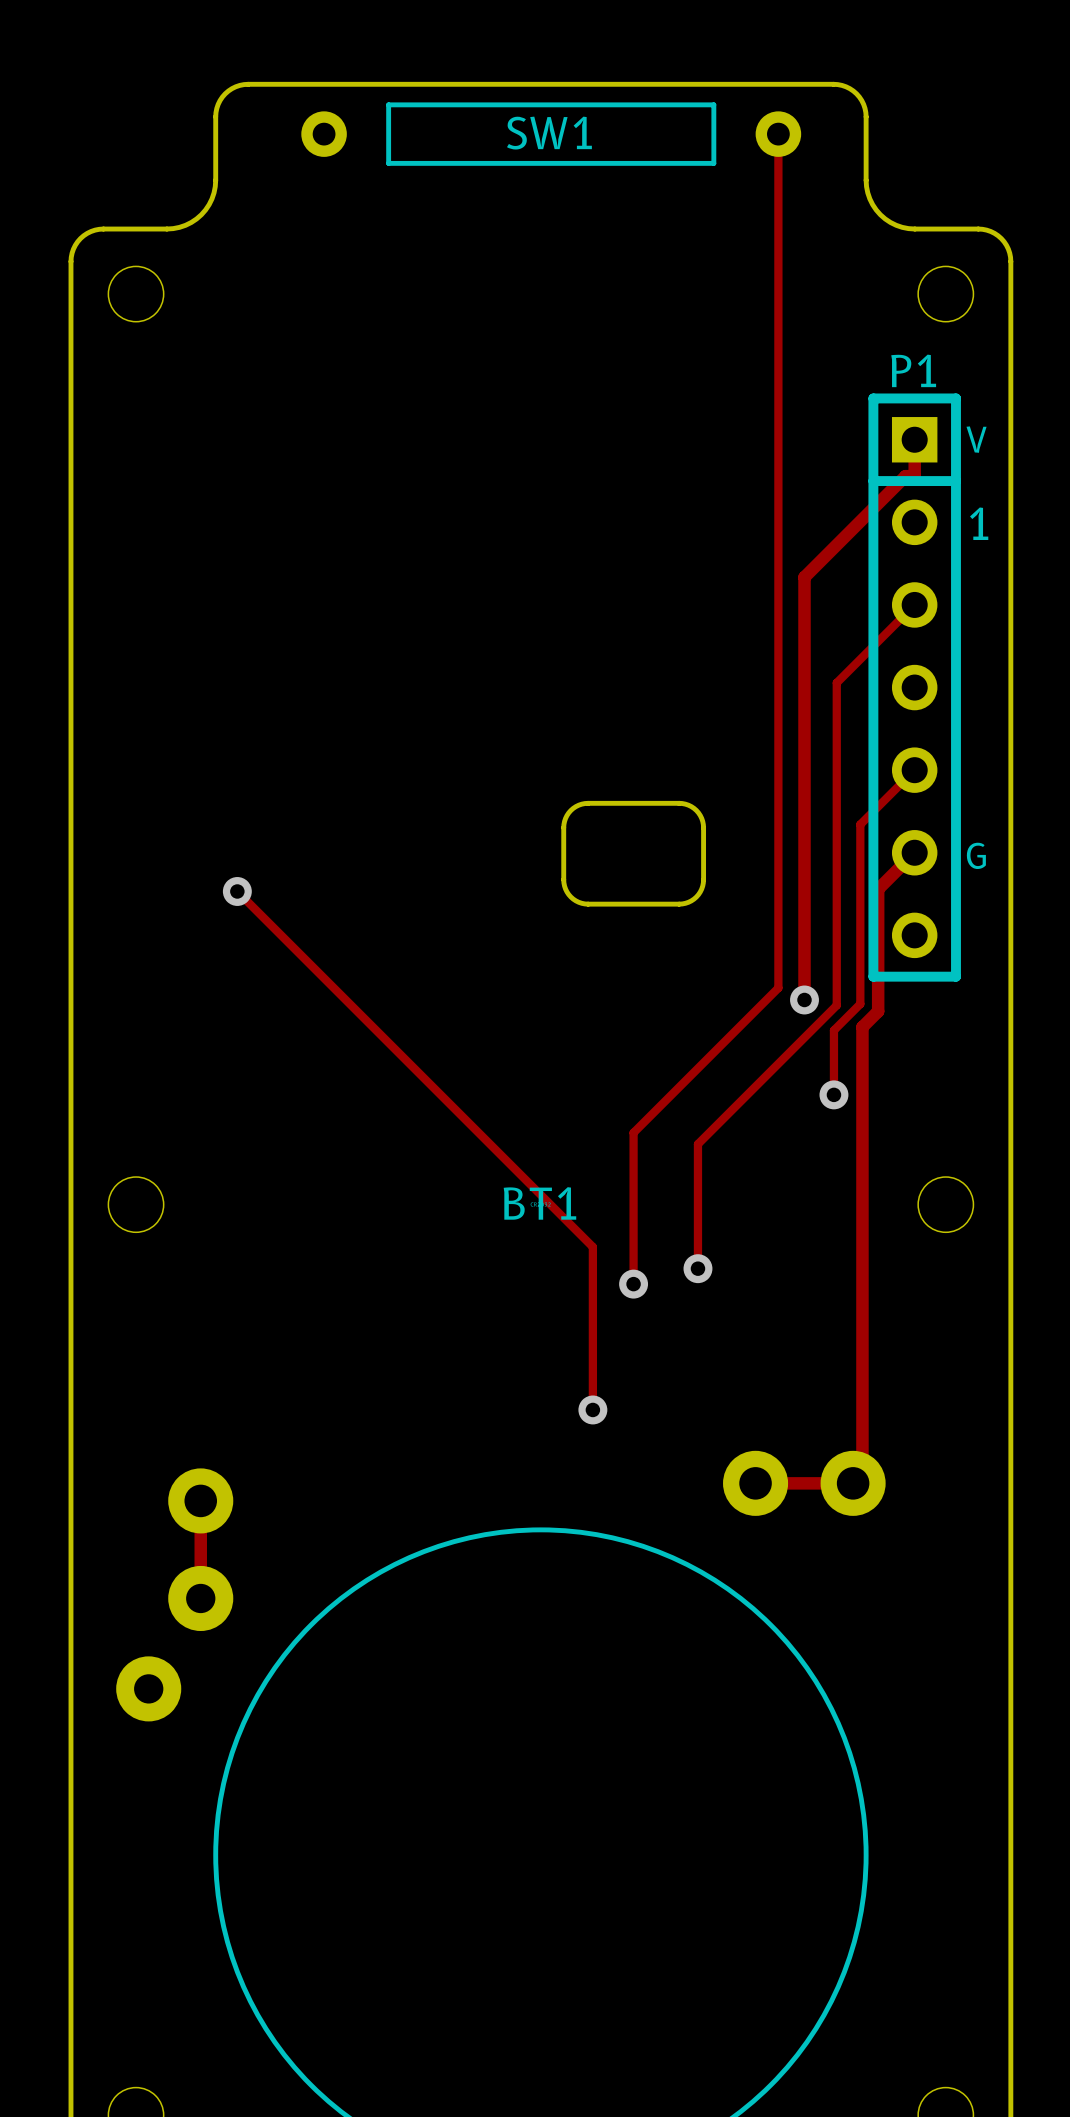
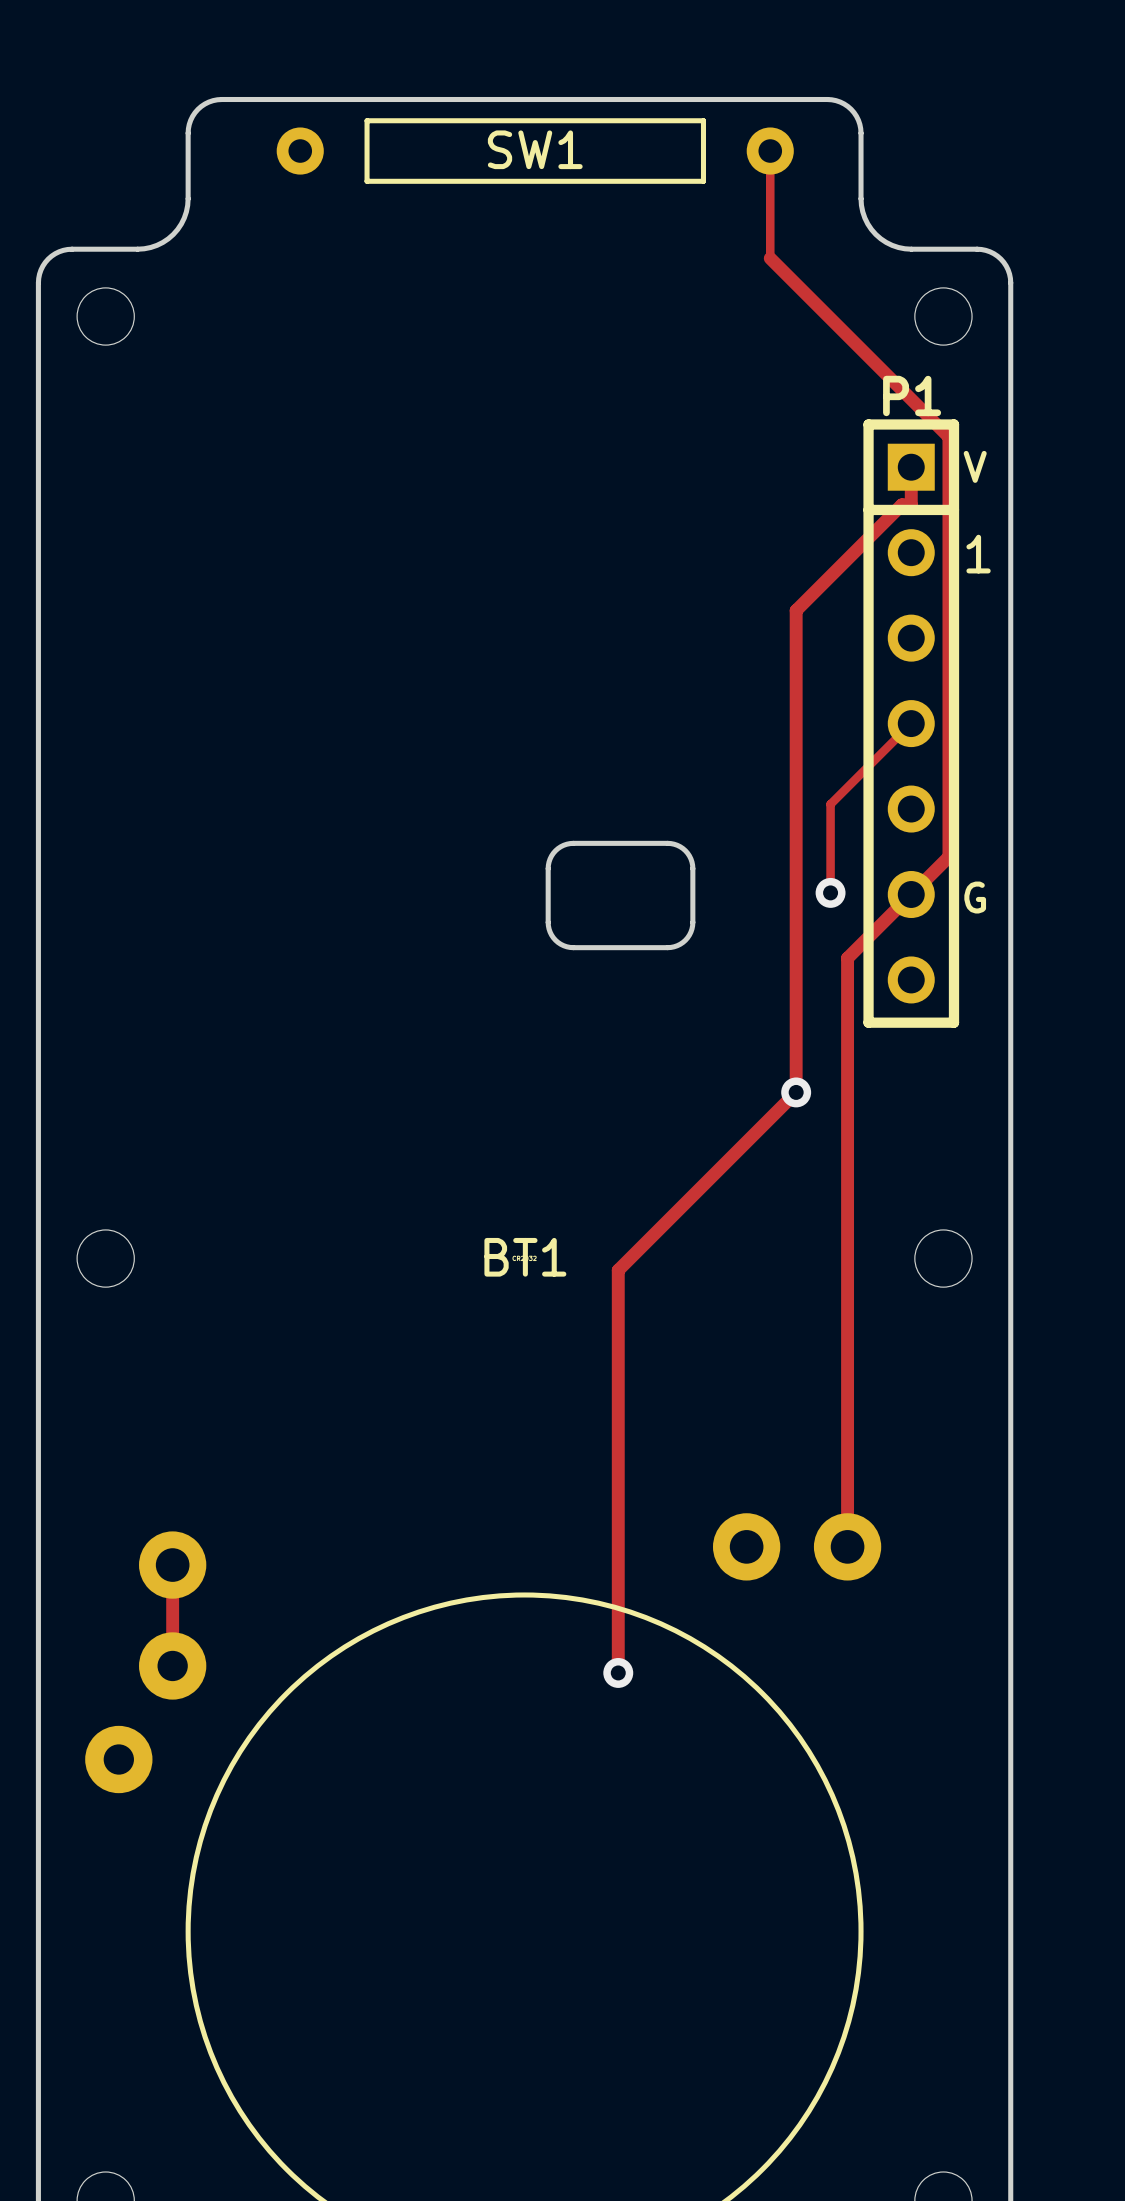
track: (778, 237) (778, 987) (633, 1132) (633, 1284) -> (770, 258) (948, 437) (948, 856) (911, 894)
track: (804, 577) (804, 999) -> (797, 609) (796, 1092) (618, 1270) (618, 1672)
track: (914, 604) (836, 682) (836, 1005) (697, 1144) (697, 1268) -> none
track: none -> (911, 723) (830, 804) (830, 892)
track: (914, 770) (860, 824) (860, 1004) (833, 1030) (833, 1094) -> none
via: none -> (830, 892)
track: (878, 889) (878, 1011) (862, 1027) (862, 1474) (853, 1483) (755, 1483) -> (873, 932) (847, 958) (847, 1546)
track: (237, 891) (592, 1247) (592, 1409) -> none
via: (237, 891) -> none
via: (804, 999) -> none
via: none -> (796, 1092)
via: (833, 1094) -> none
via: (697, 1268) -> none
via: (633, 1284) -> none
via: (592, 1409) -> none
via: none -> (618, 1672)

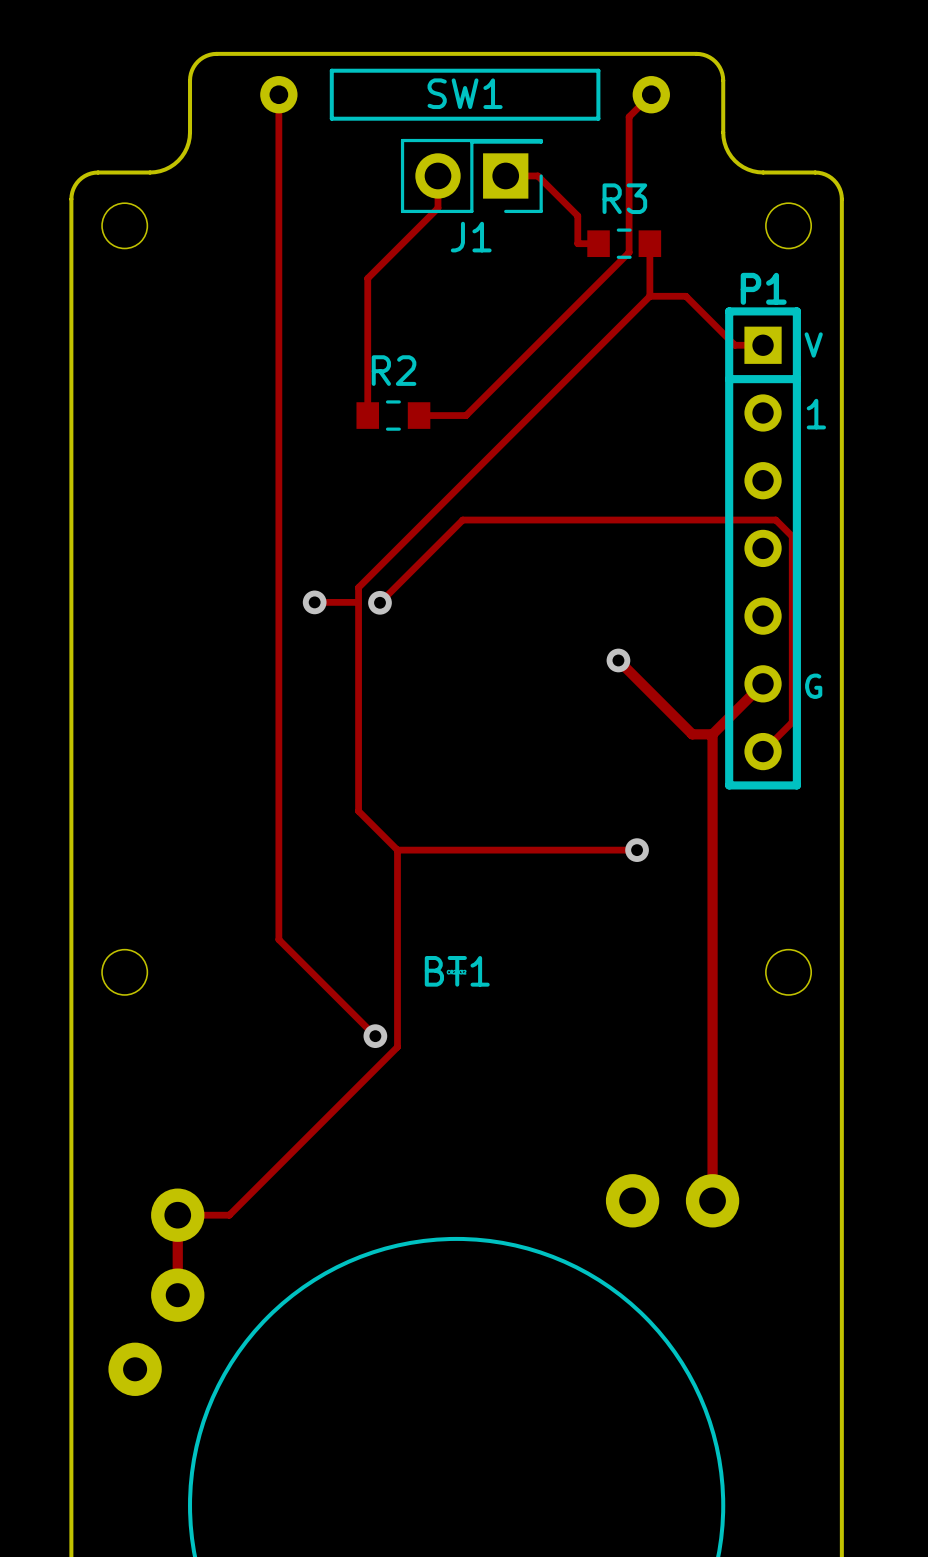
track: none -> (278, 94) (278, 939) (375, 1036)
track: (770, 151) (770, 258) (948, 437) (948, 856) (911, 894) -> (651, 94) (629, 116) (629, 252) (466, 415) (419, 415)
track: none -> (438, 175) (438, 208) (367, 278) (367, 415)
J1: none -> (471, 175)
track: none -> (505, 175) (537, 175) (577, 215) (577, 243) (598, 243)
R3: none -> (624, 243)
track: none -> (649, 243) (649, 296)
track: none -> (649, 296) (358, 587) (358, 811) (397, 850)
track: (911, 467) (911, 504) (901, 504) (796, 610) (796, 1092) (618, 1270) (618, 1672) -> (763, 345) (734, 345) (685, 296) (649, 296)
R2: none -> (393, 415)
track: (911, 723) (830, 804) (830, 892) -> none
track: none -> (314, 602) (358, 602)
via: none -> (314, 602)
track: none -> (379, 602) (462, 520) (775, 520) (792, 536) (792, 722) (763, 751)
via: none -> (379, 602)
track: none -> (618, 660) (692, 734) (712, 734)
via position: (830, 892) -> (618, 660)
part: (620, 895) -> none
via position: (796, 1092) -> (637, 850)
track: none -> (397, 850) (637, 850)
track: none -> (397, 850) (397, 1047) (229, 1215) (177, 1215)
via: none -> (375, 1036)
via: (618, 1672) -> none

